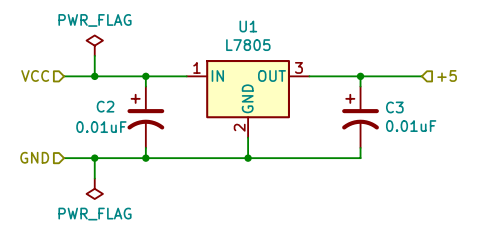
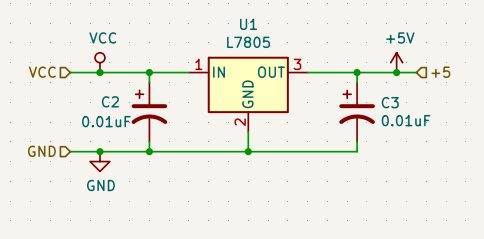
power symbol: PWR_FLAG (94, 45) -> none
power symbol: none -> VCC (99, 62)
power symbol: none -> +5V (396, 62)
junction: none -> (396, 72)
power symbol: none -> GND (99, 161)
power symbol: PWR_FLAG (94, 188) -> none

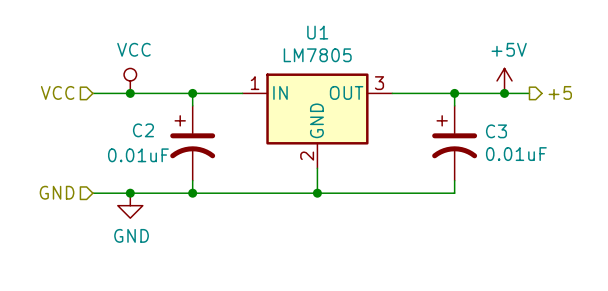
U1 value: L7805 (248, 42) -> LM7805 (317, 55)
hierarchical label shape: input (440, 72) -> output (560, 92)

